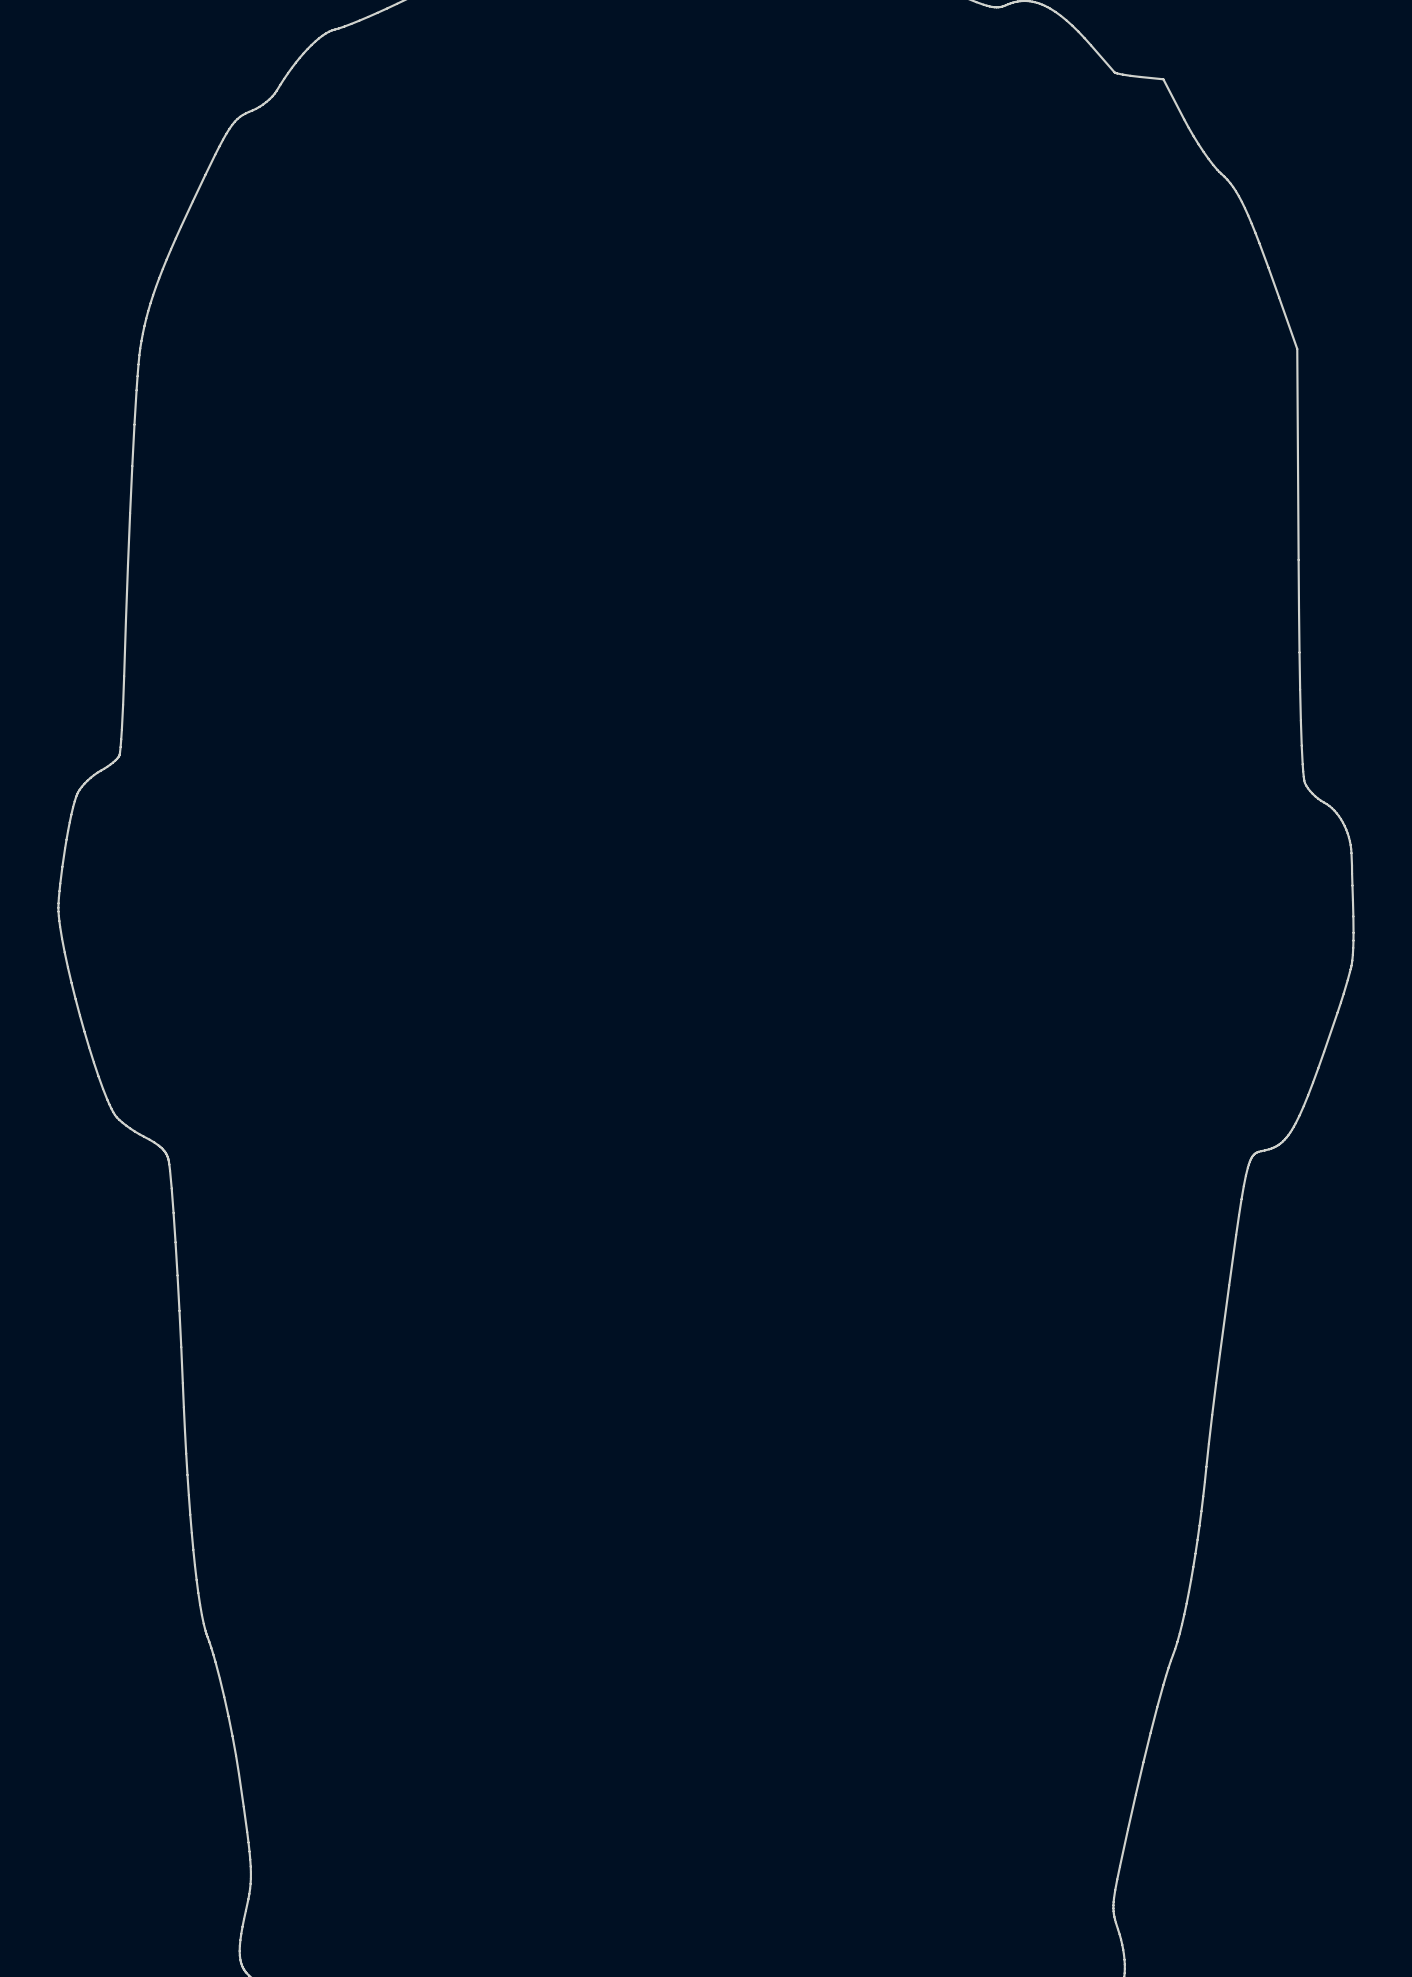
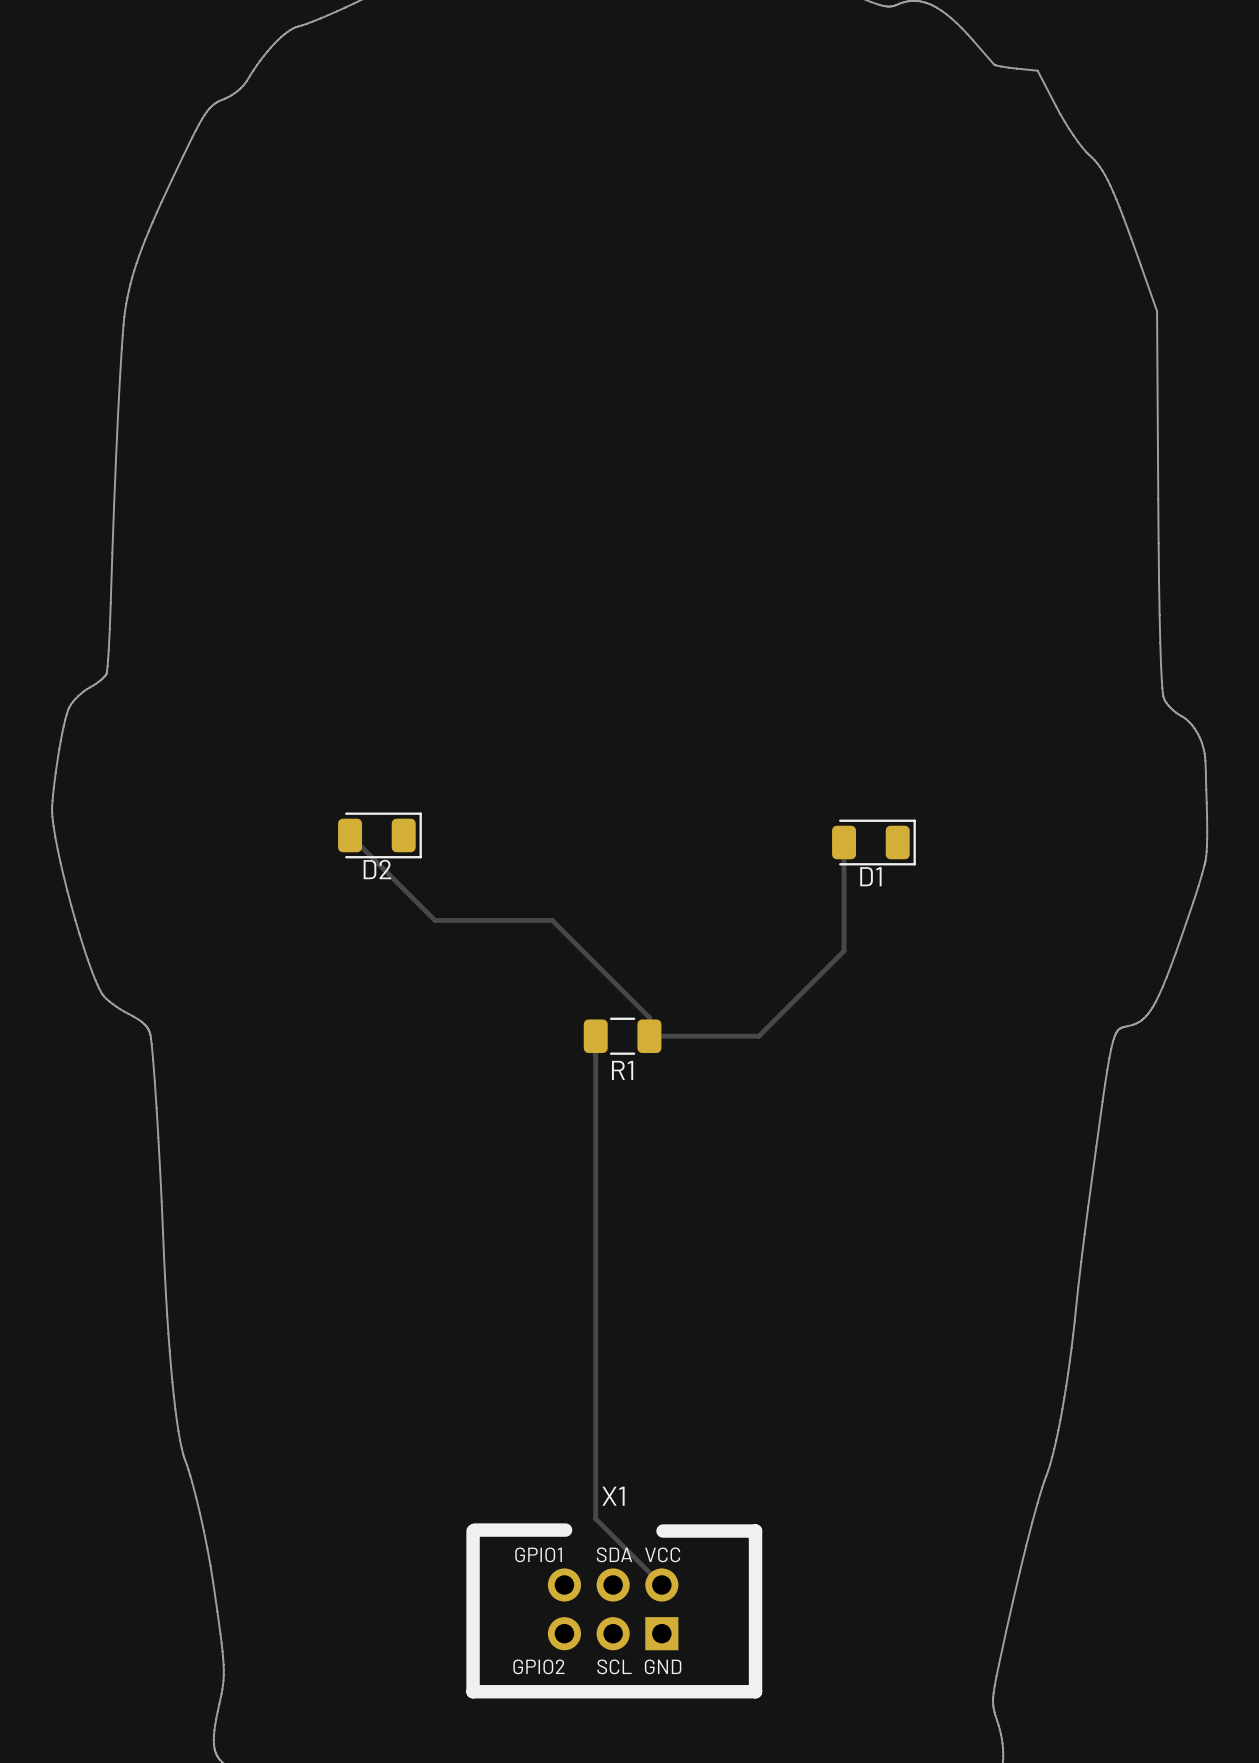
track: none -> (350, 835) (435, 920) (552, 920) (649, 1017) (649, 1036) (758, 1036) (844, 951) (844, 842)
D2: none -> (379, 835)
D1: none -> (873, 842)
track: none -> (595, 1036) (595, 1518) (661, 1584)
R1: none -> (622, 1036)
X1: none -> (614, 1610)

